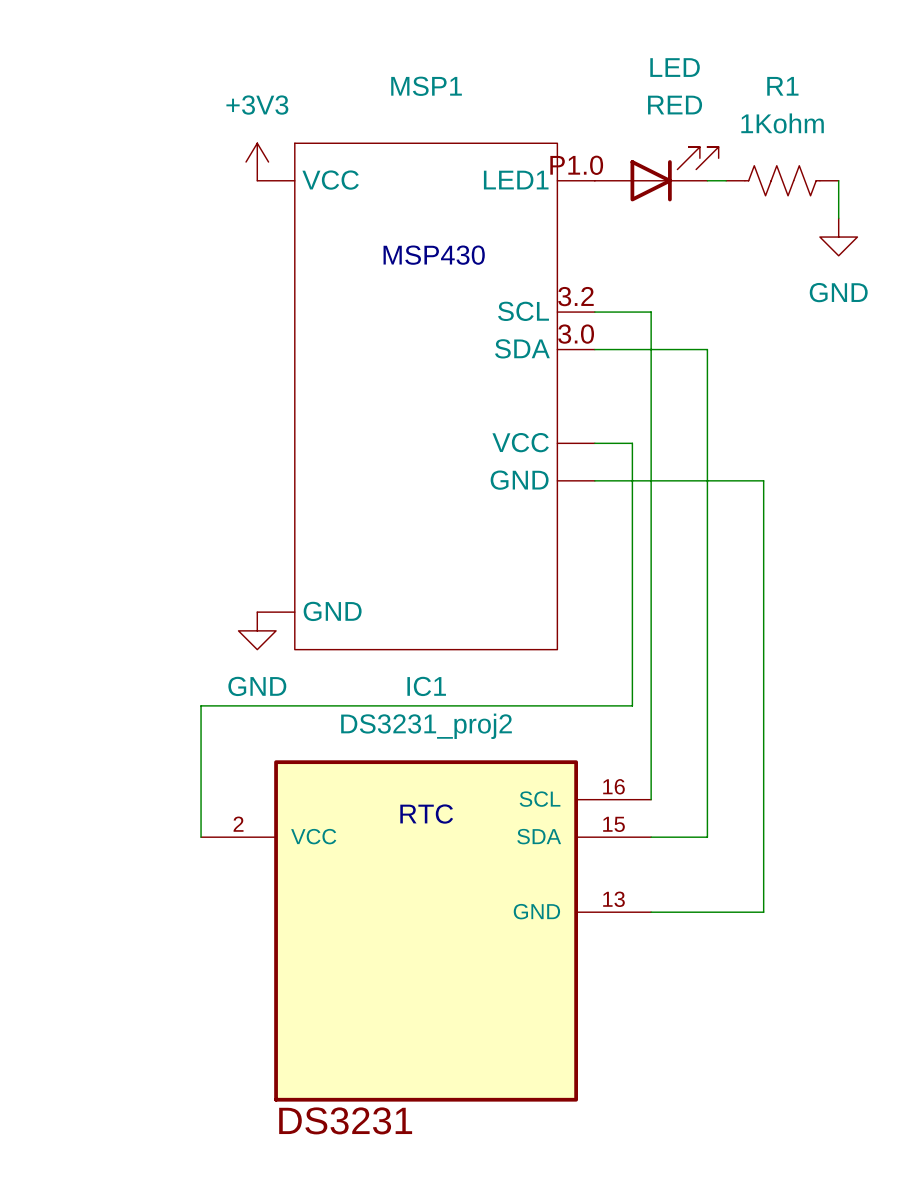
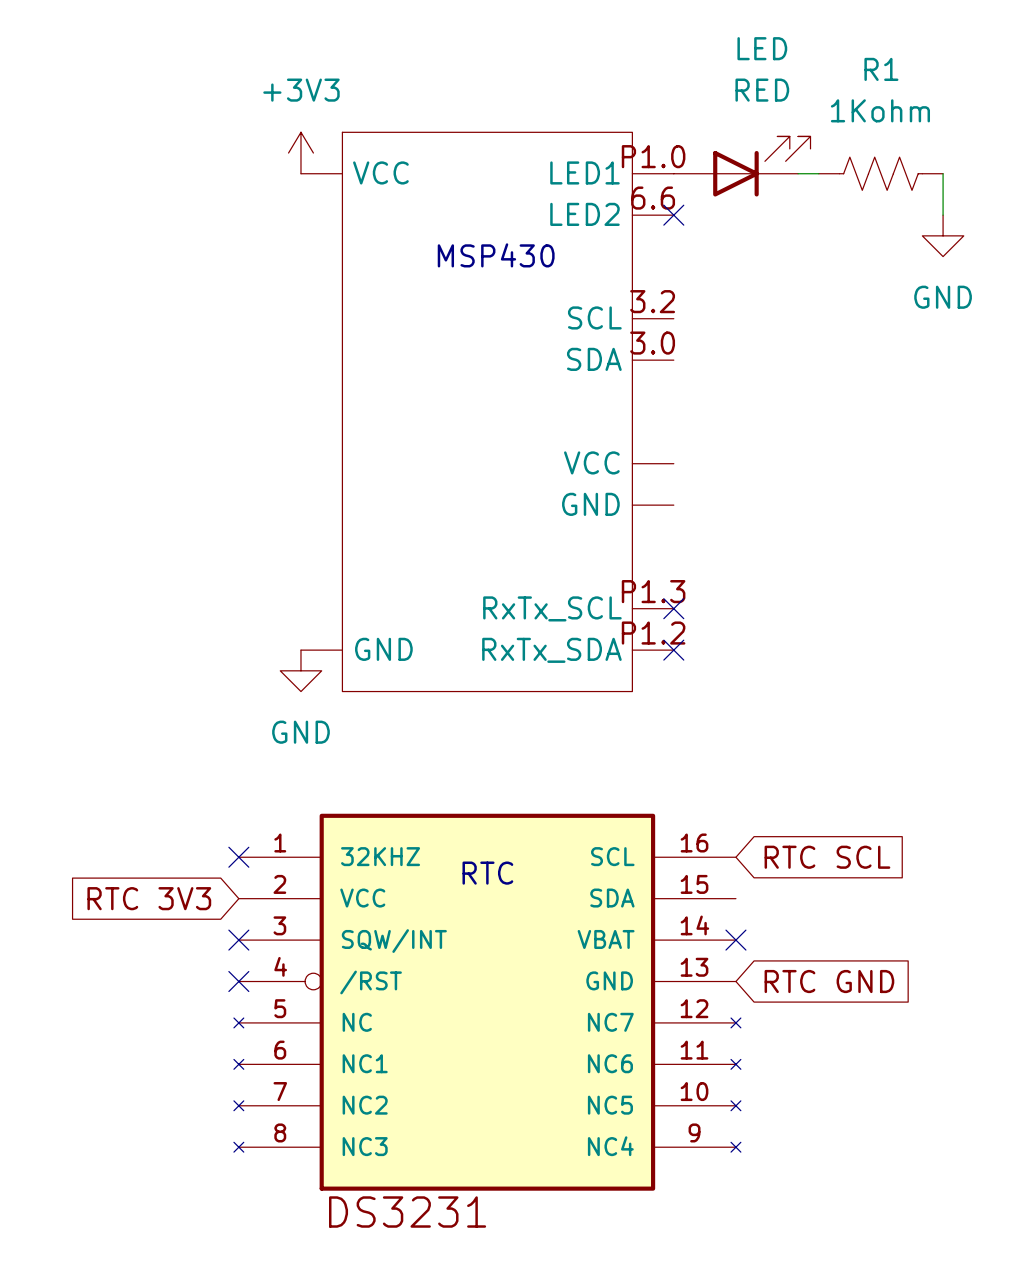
no-connect mark: none -> (673, 215)
wire: (594, 312) (651, 312) (651, 799) -> none
wire: (594, 349) (707, 349) (707, 837) (651, 837) -> none
MSP1: (426, 396) -> none
part: none -> (487, 411)
wire: (594, 443) (632, 443) (632, 705) (201, 705) (201, 837) -> none
wire: (594, 480) (763, 480) (763, 912) (651, 912) -> none
no-connect mark: none -> (673, 608)
no-connect mark: none -> (673, 650)
no-connect mark: none -> (238, 857)
global label: none -> RTC SCL (827, 857)
global label: none -> RTC 3V3 (149, 898)
no-connect mark: none -> (238, 940)
no-connect mark: none -> (735, 940)
no-connect mark: none -> (238, 981)
global label: none -> RTC GND (829, 981)
IC1: DS3231_proj2 (426, 930) -> none
part: none -> (487, 1002)

